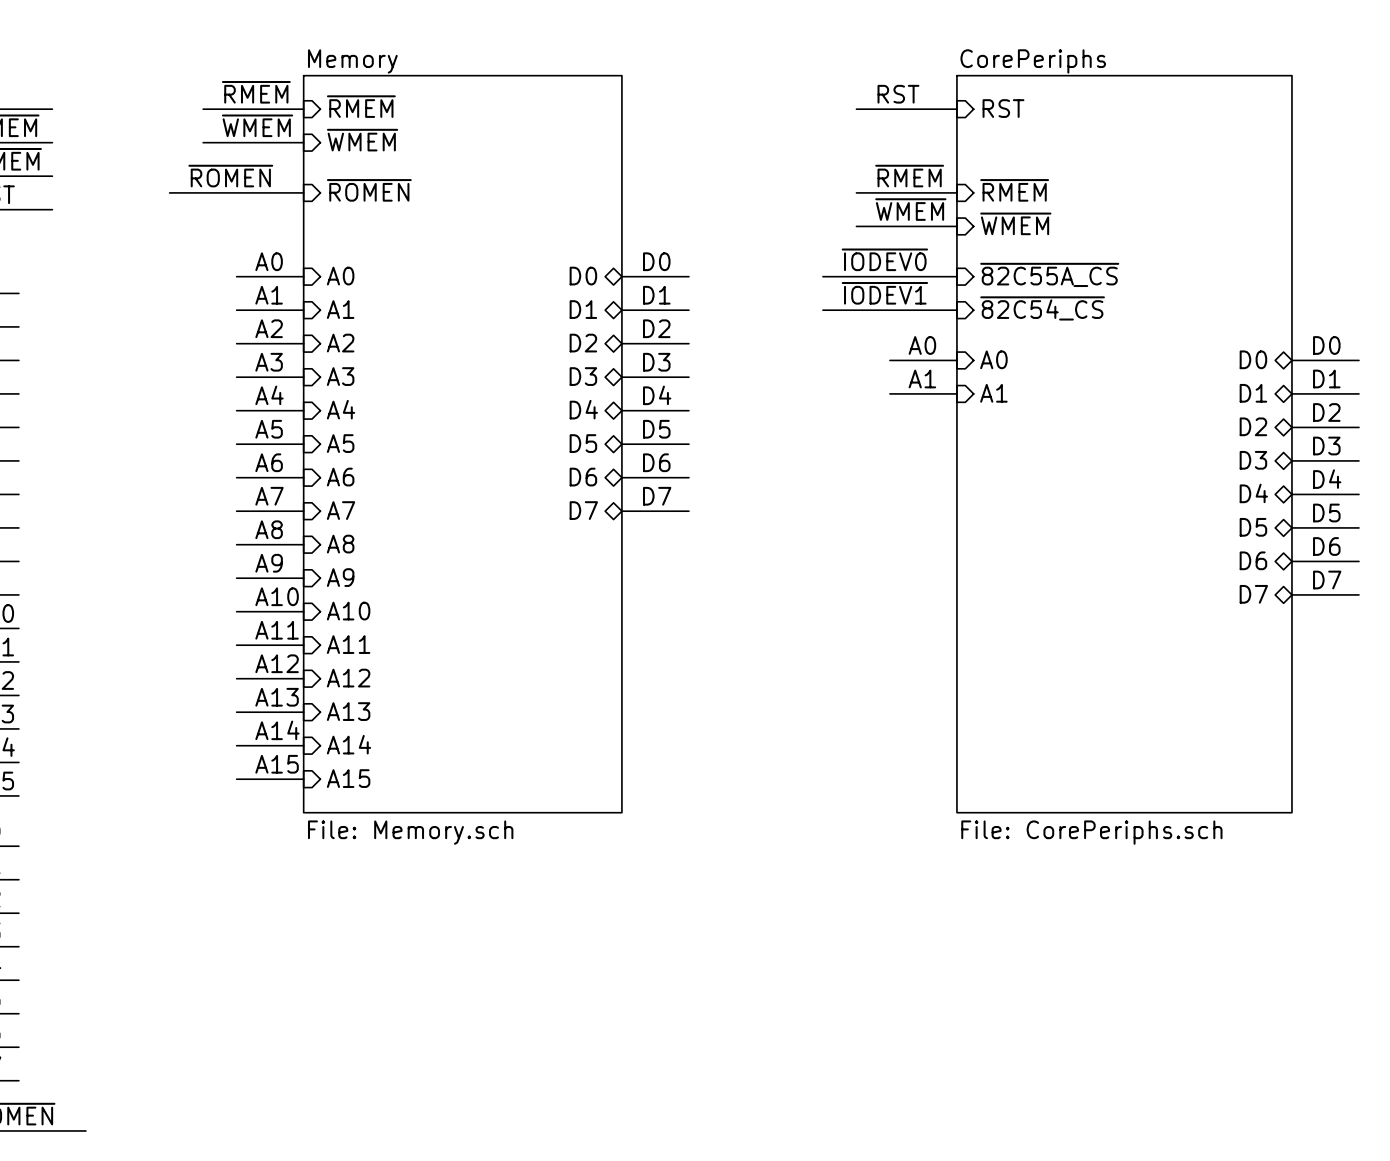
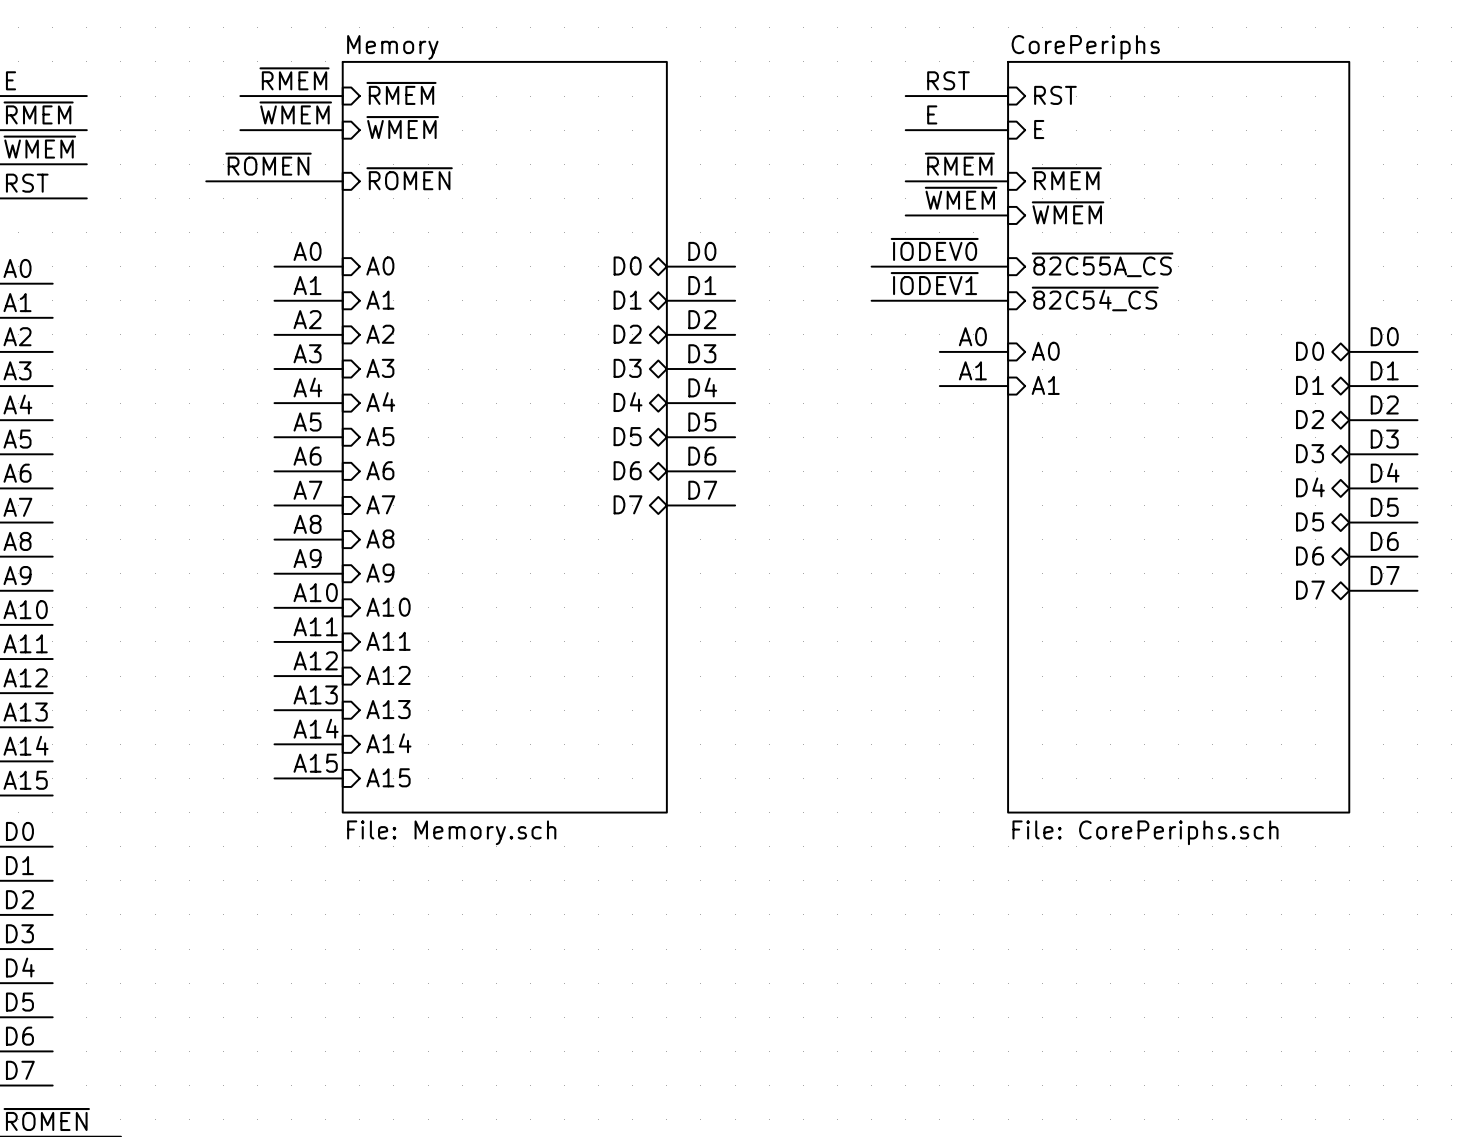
label: none -> E (932, 114)
wire: none -> (905, 130) (1008, 130)
sheet pin: none -> E (1039, 129)

